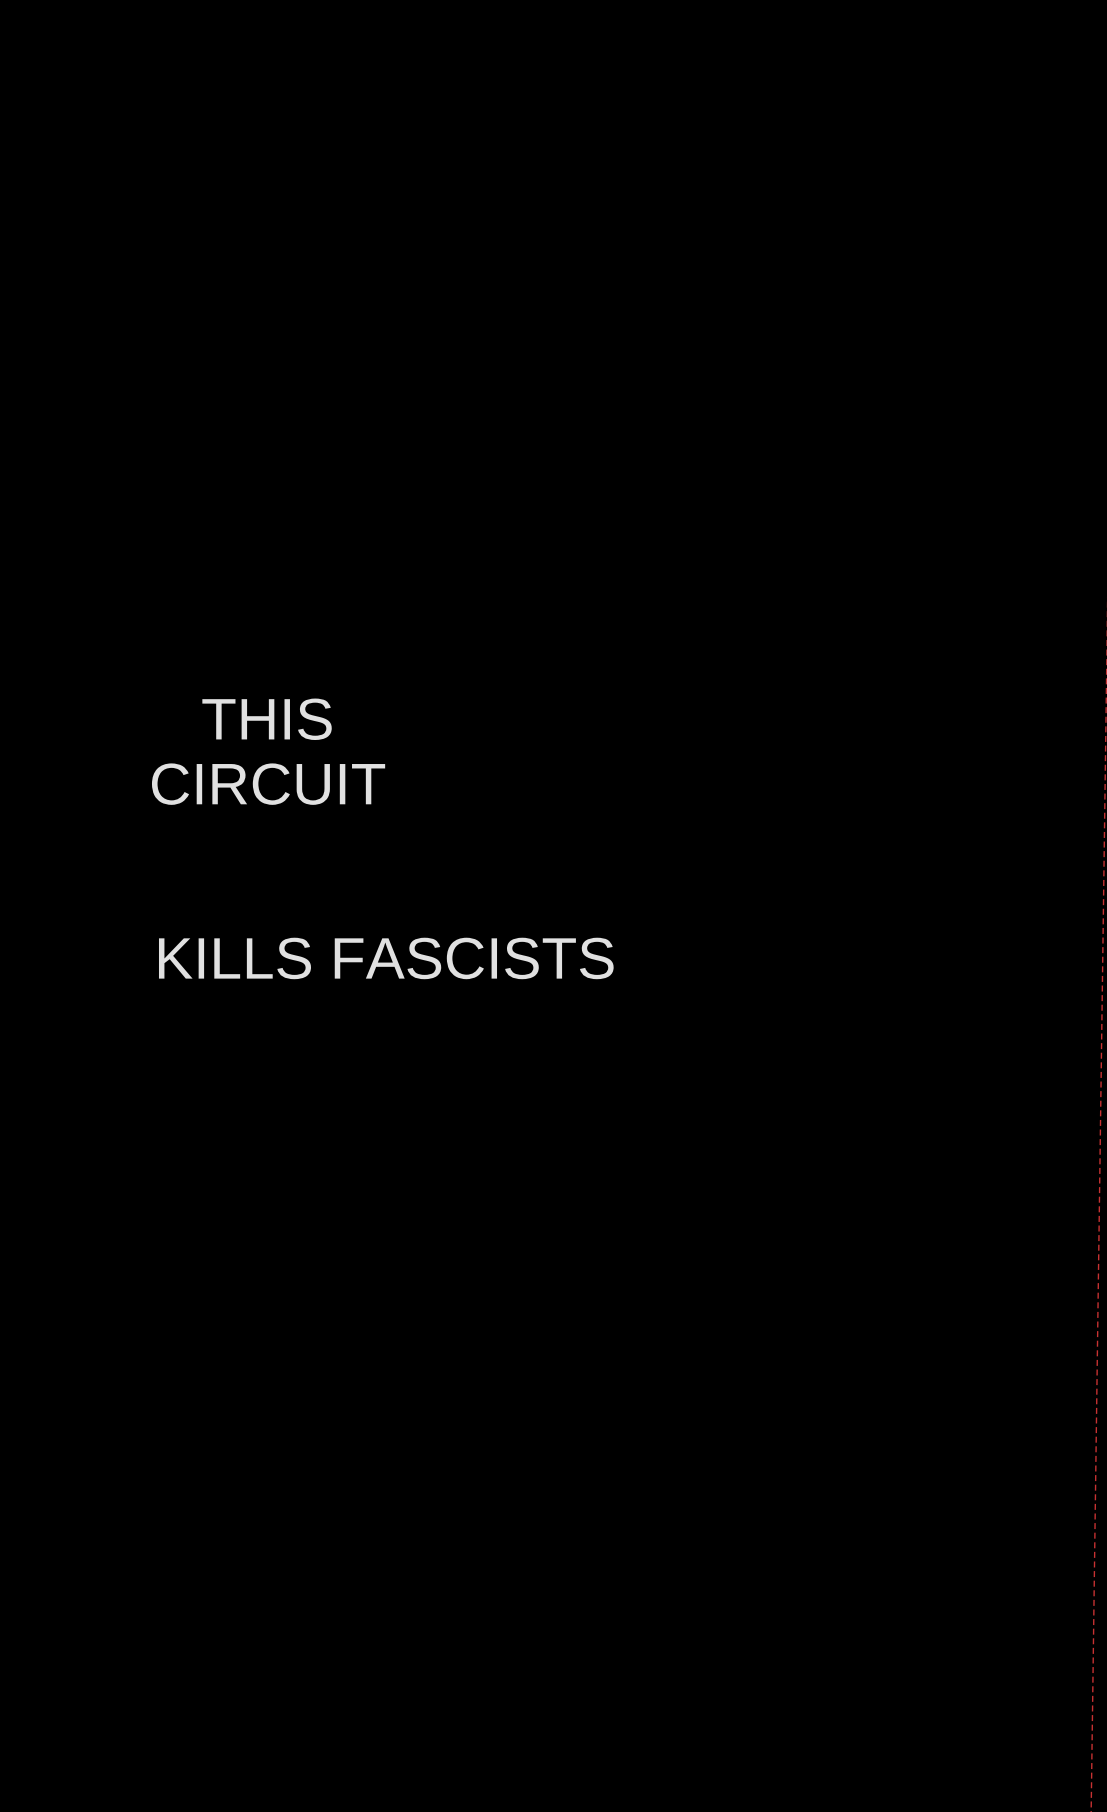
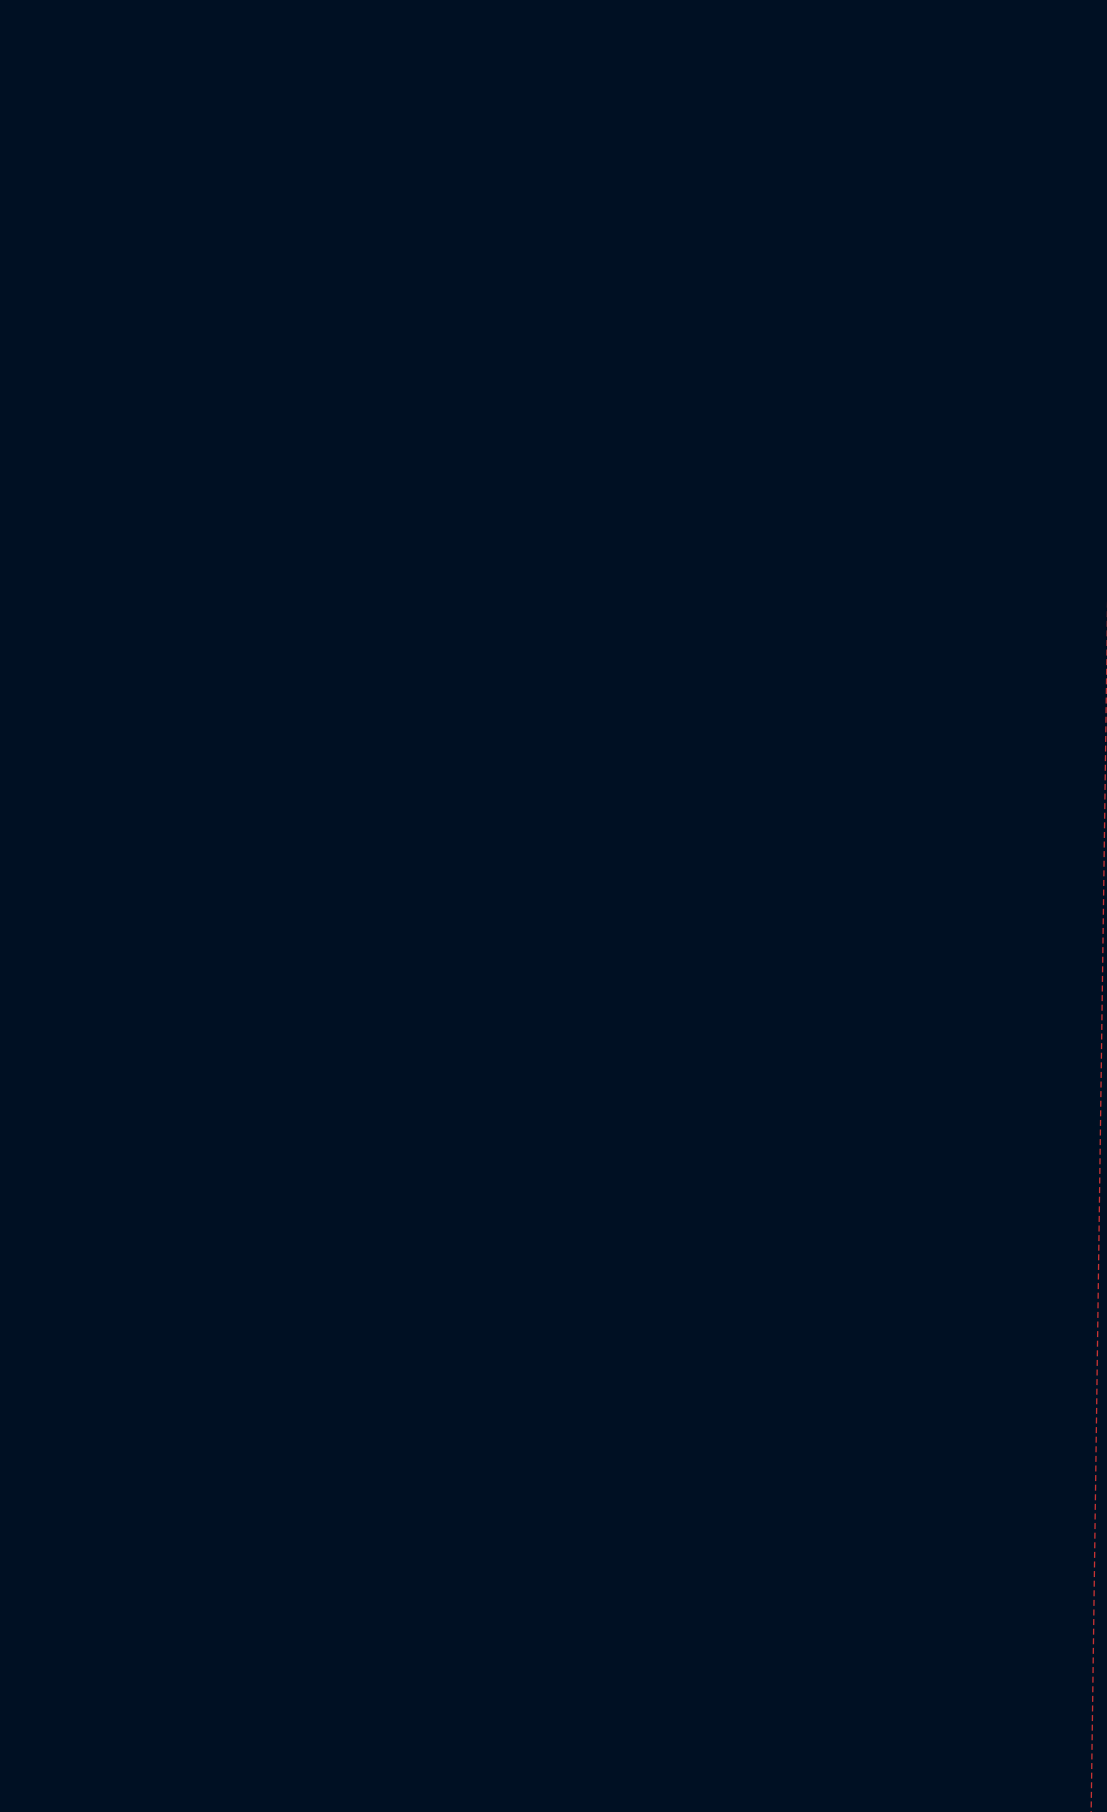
text: THIS (267, 719) -> none
text: CIRCUIT (268, 784) -> none
text: KILLS FASCISTS (386, 958) -> none

